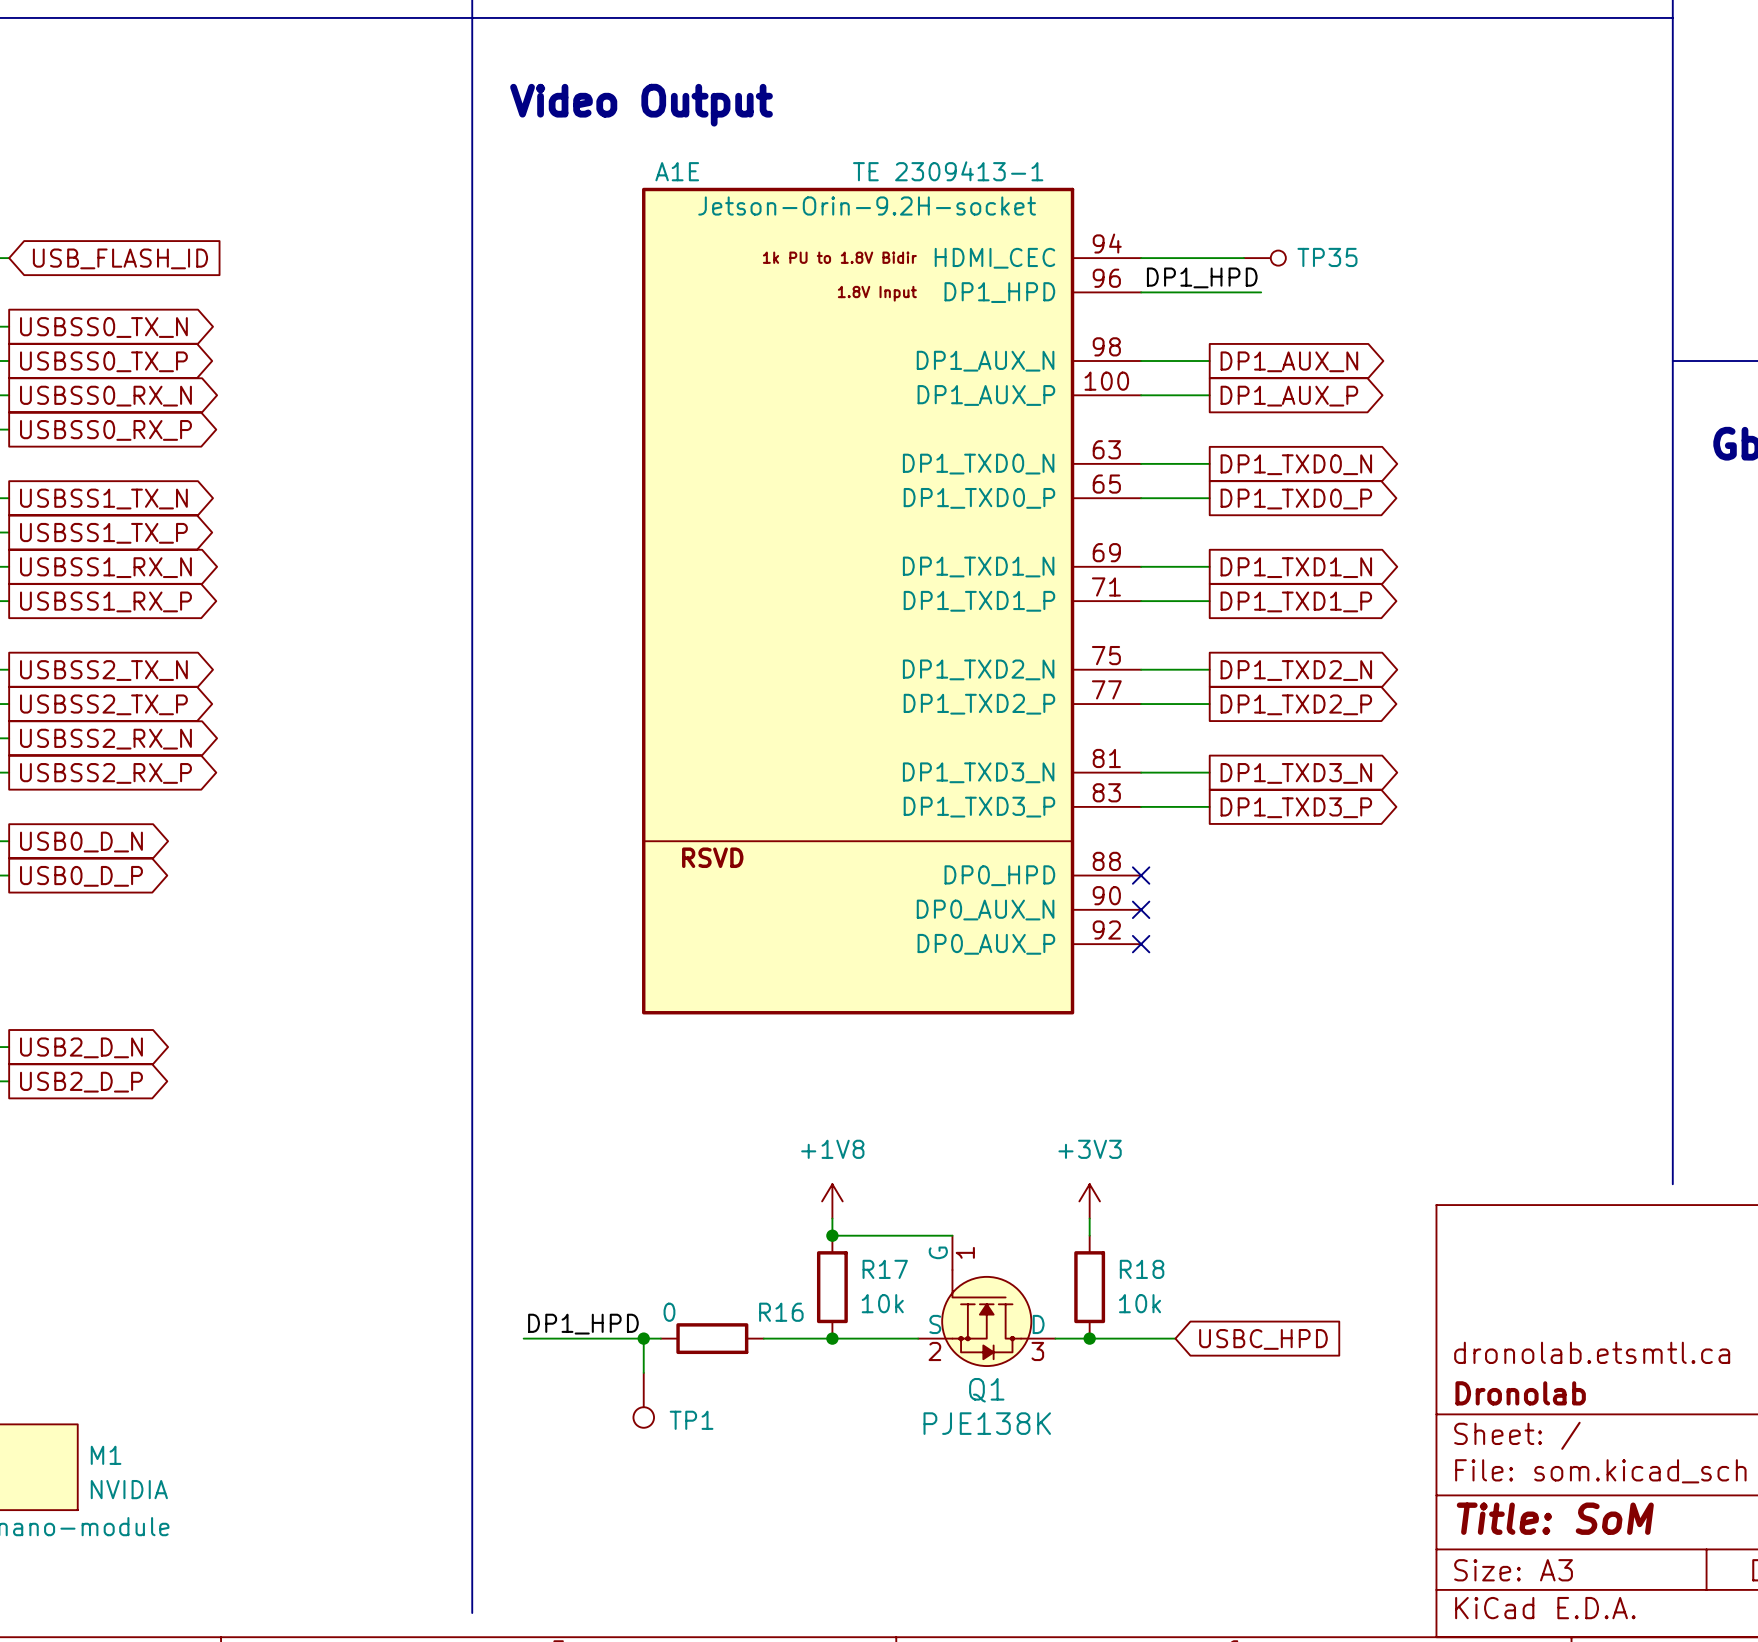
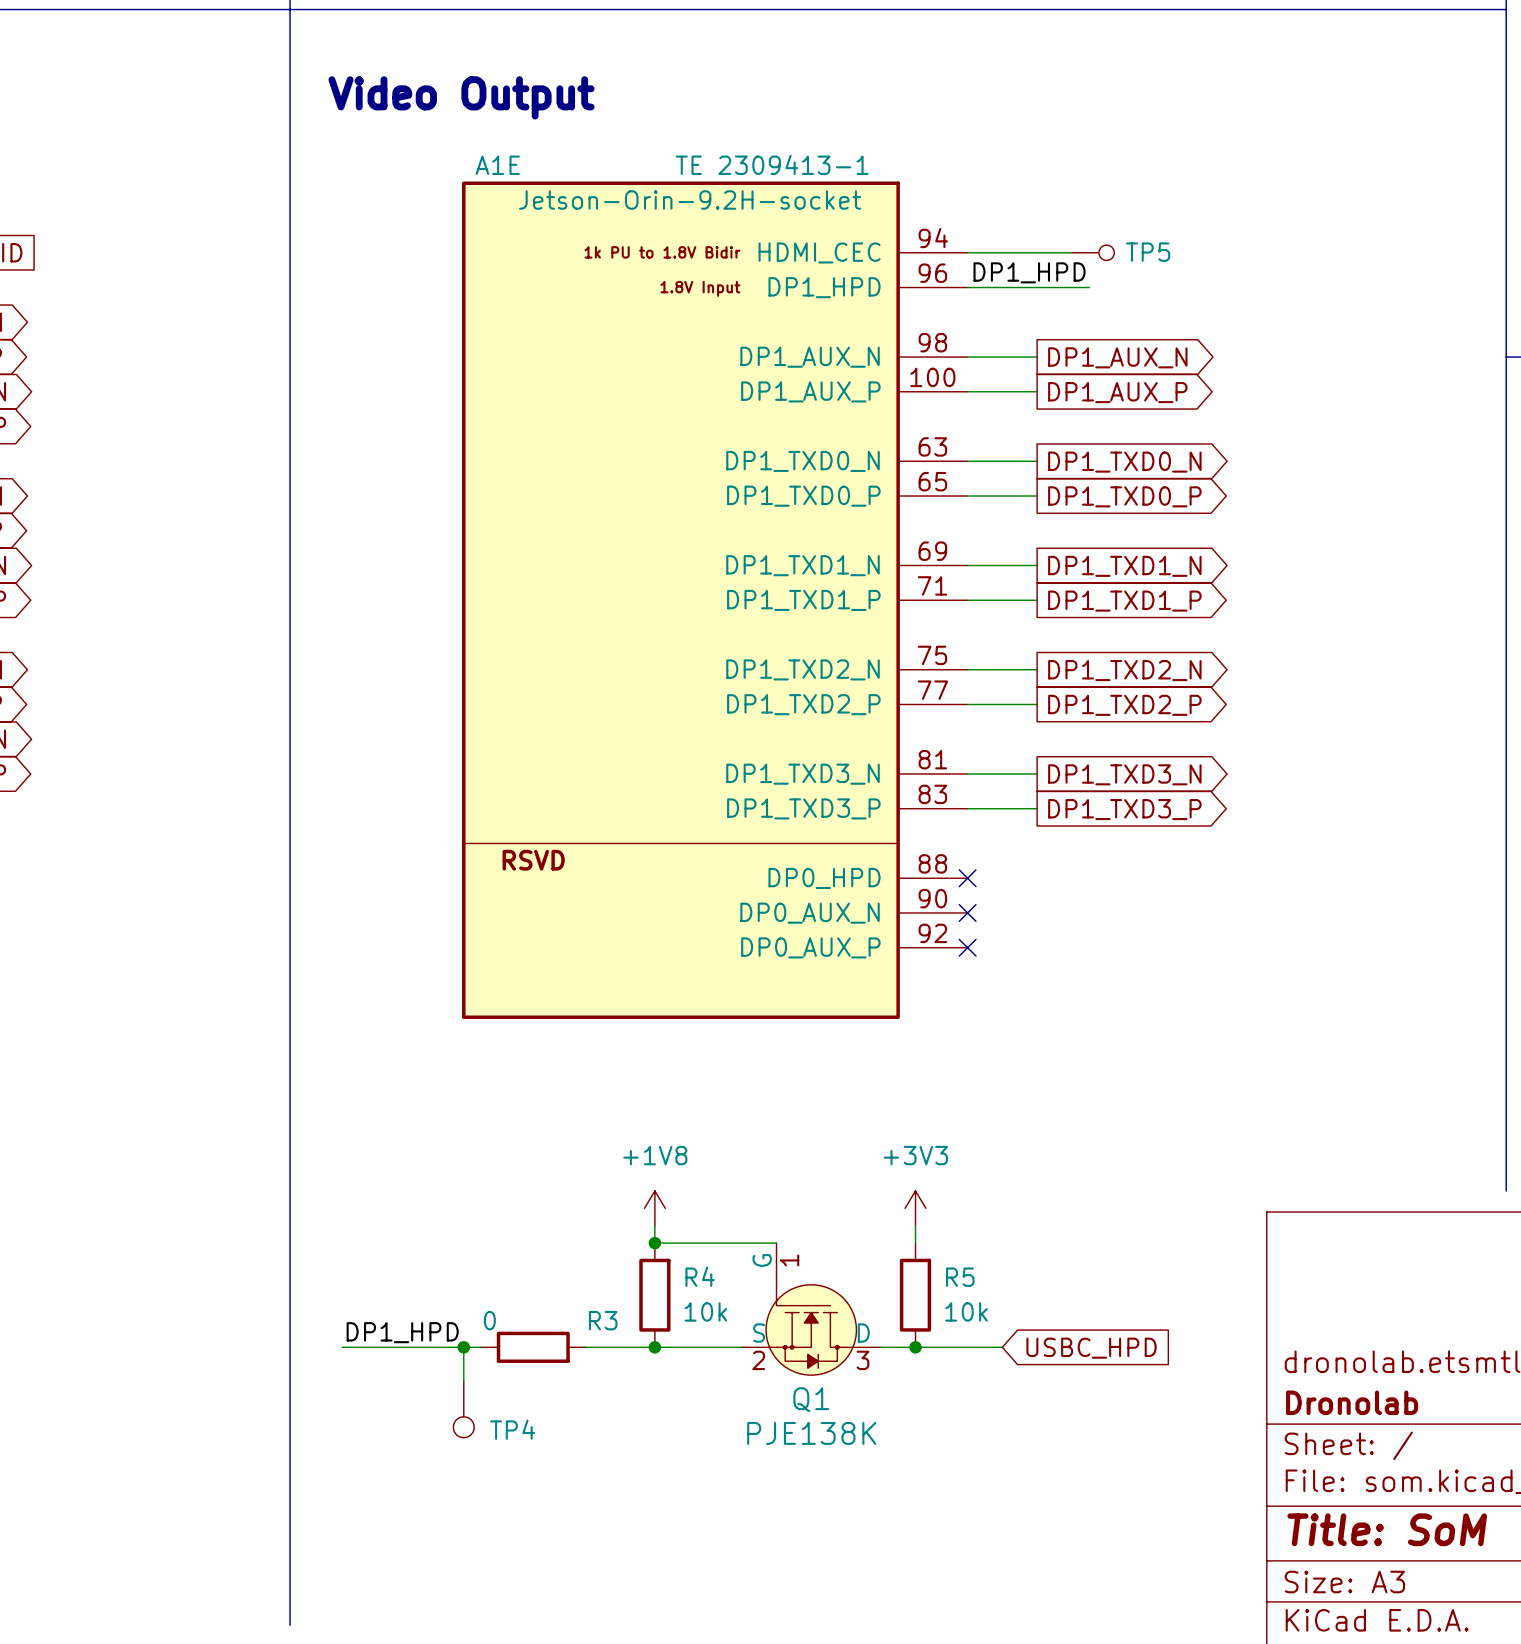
TP35 name: TP35 (1327, 257) -> TP5 (1148, 252)
R17 name: R17 (885, 1269) -> R4 (700, 1276)
R18 name: R18 (1142, 1269) -> R5 (960, 1277)
R16 name: R16 (781, 1312) -> R3 (603, 1320)
TP1 name: TP1 (691, 1420) -> TP4 (512, 1429)

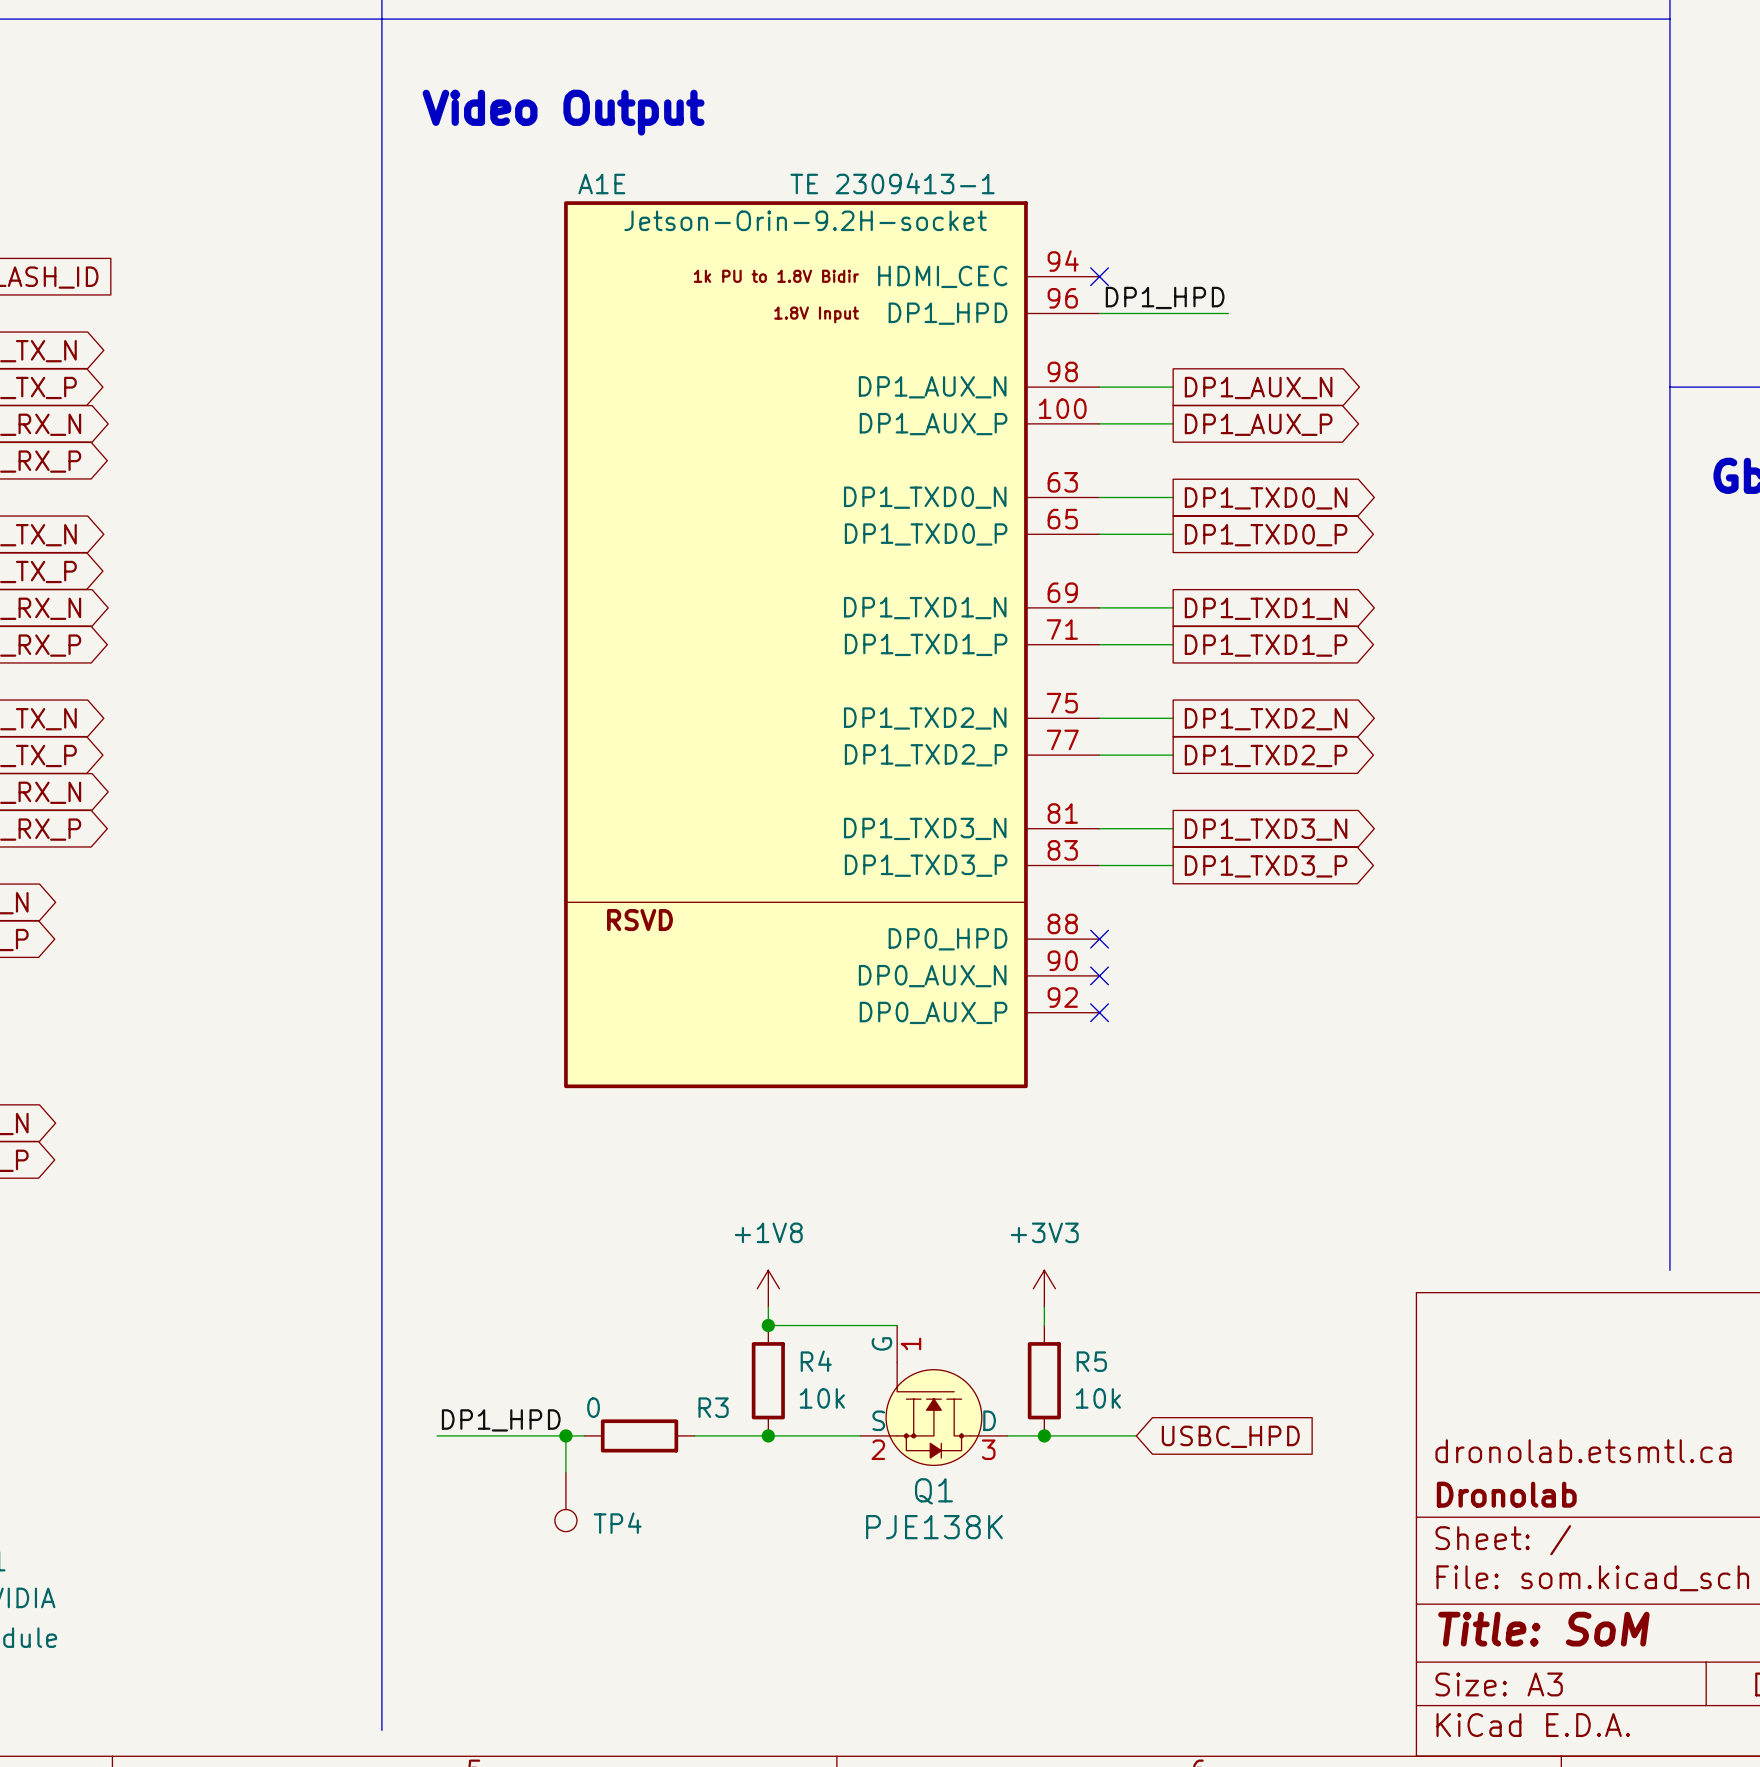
wire: (967, 252) (1071, 252) -> none
no-connect mark: none -> (1099, 276)
TP5: (1093, 252) -> none

